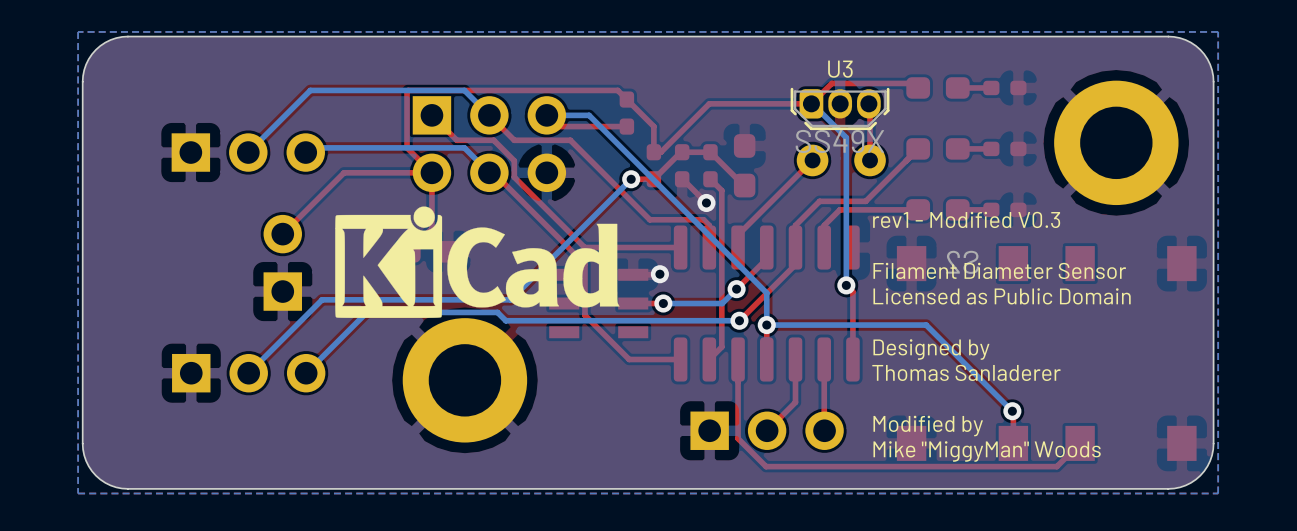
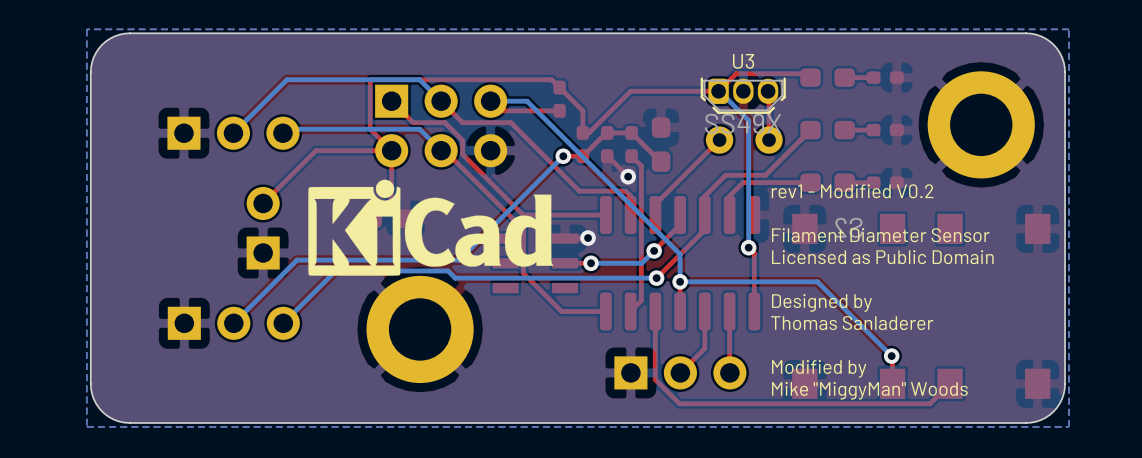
text: rev1 - Modified V0.3 (966, 219) -> rev1 - Modified V0.2 (852, 191)

